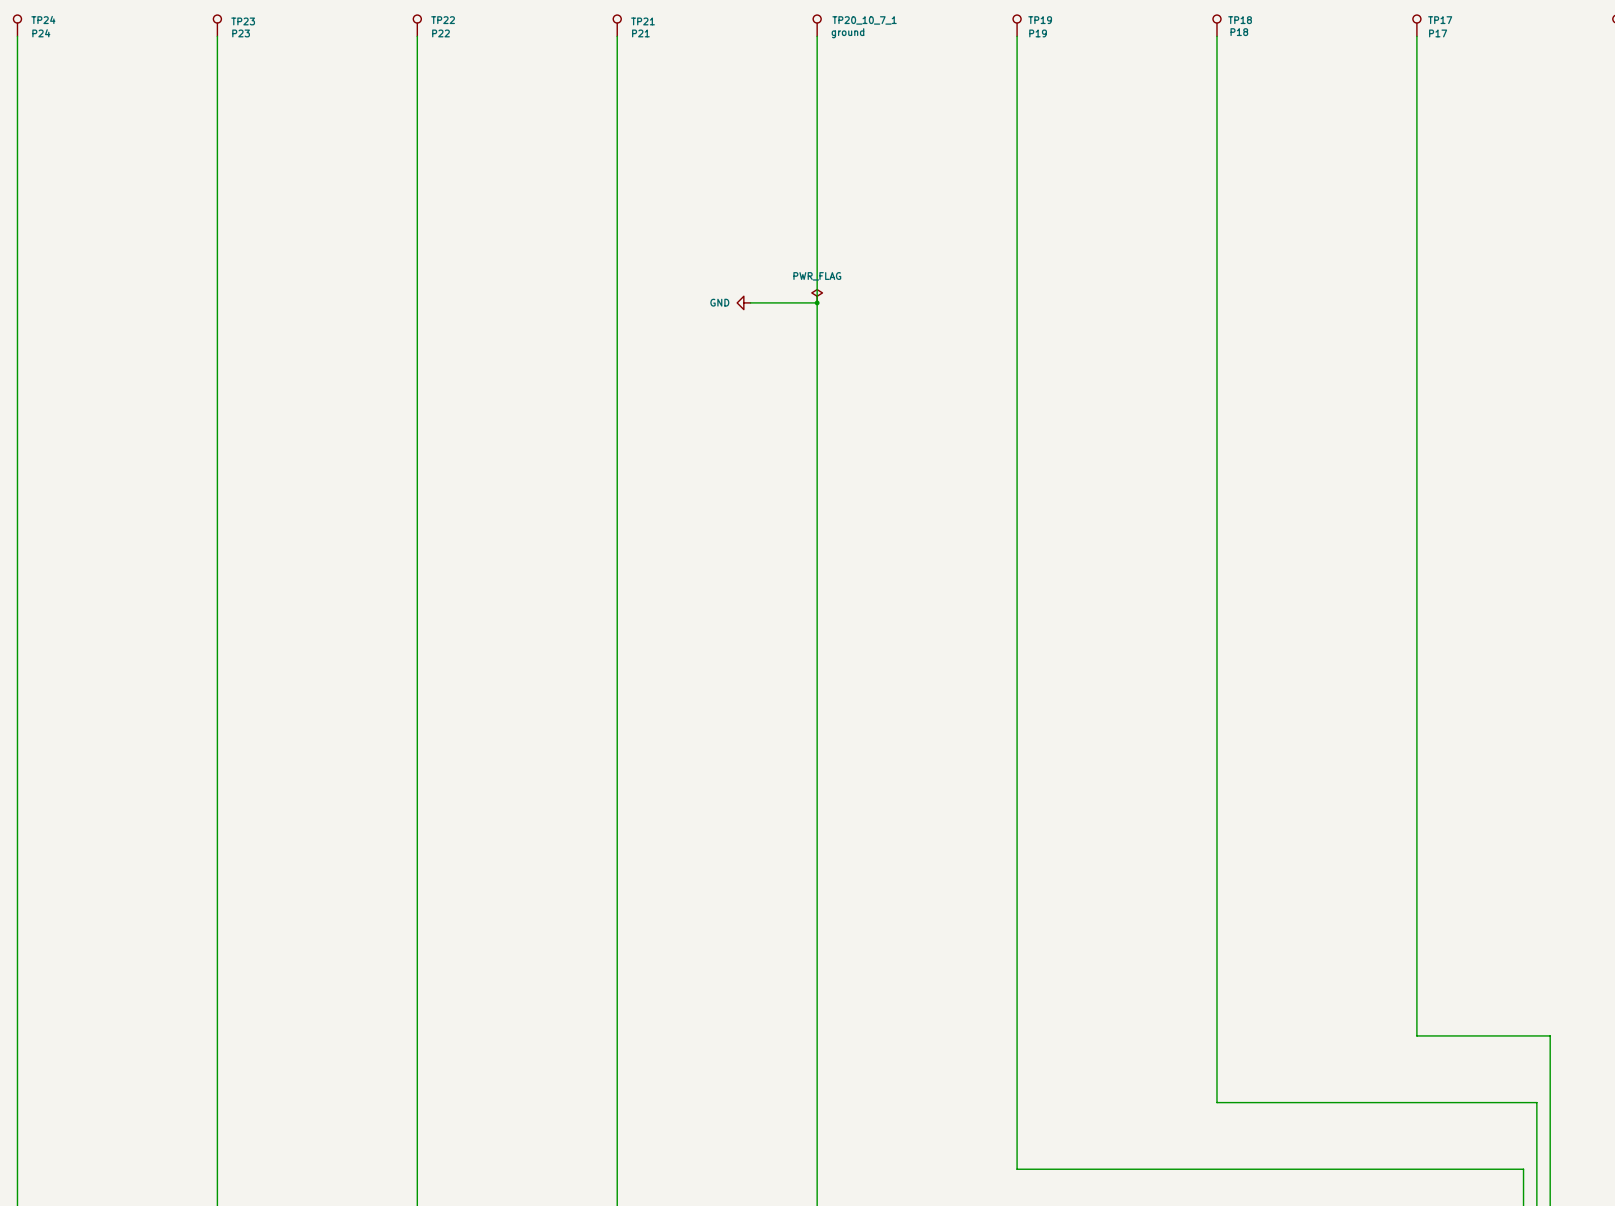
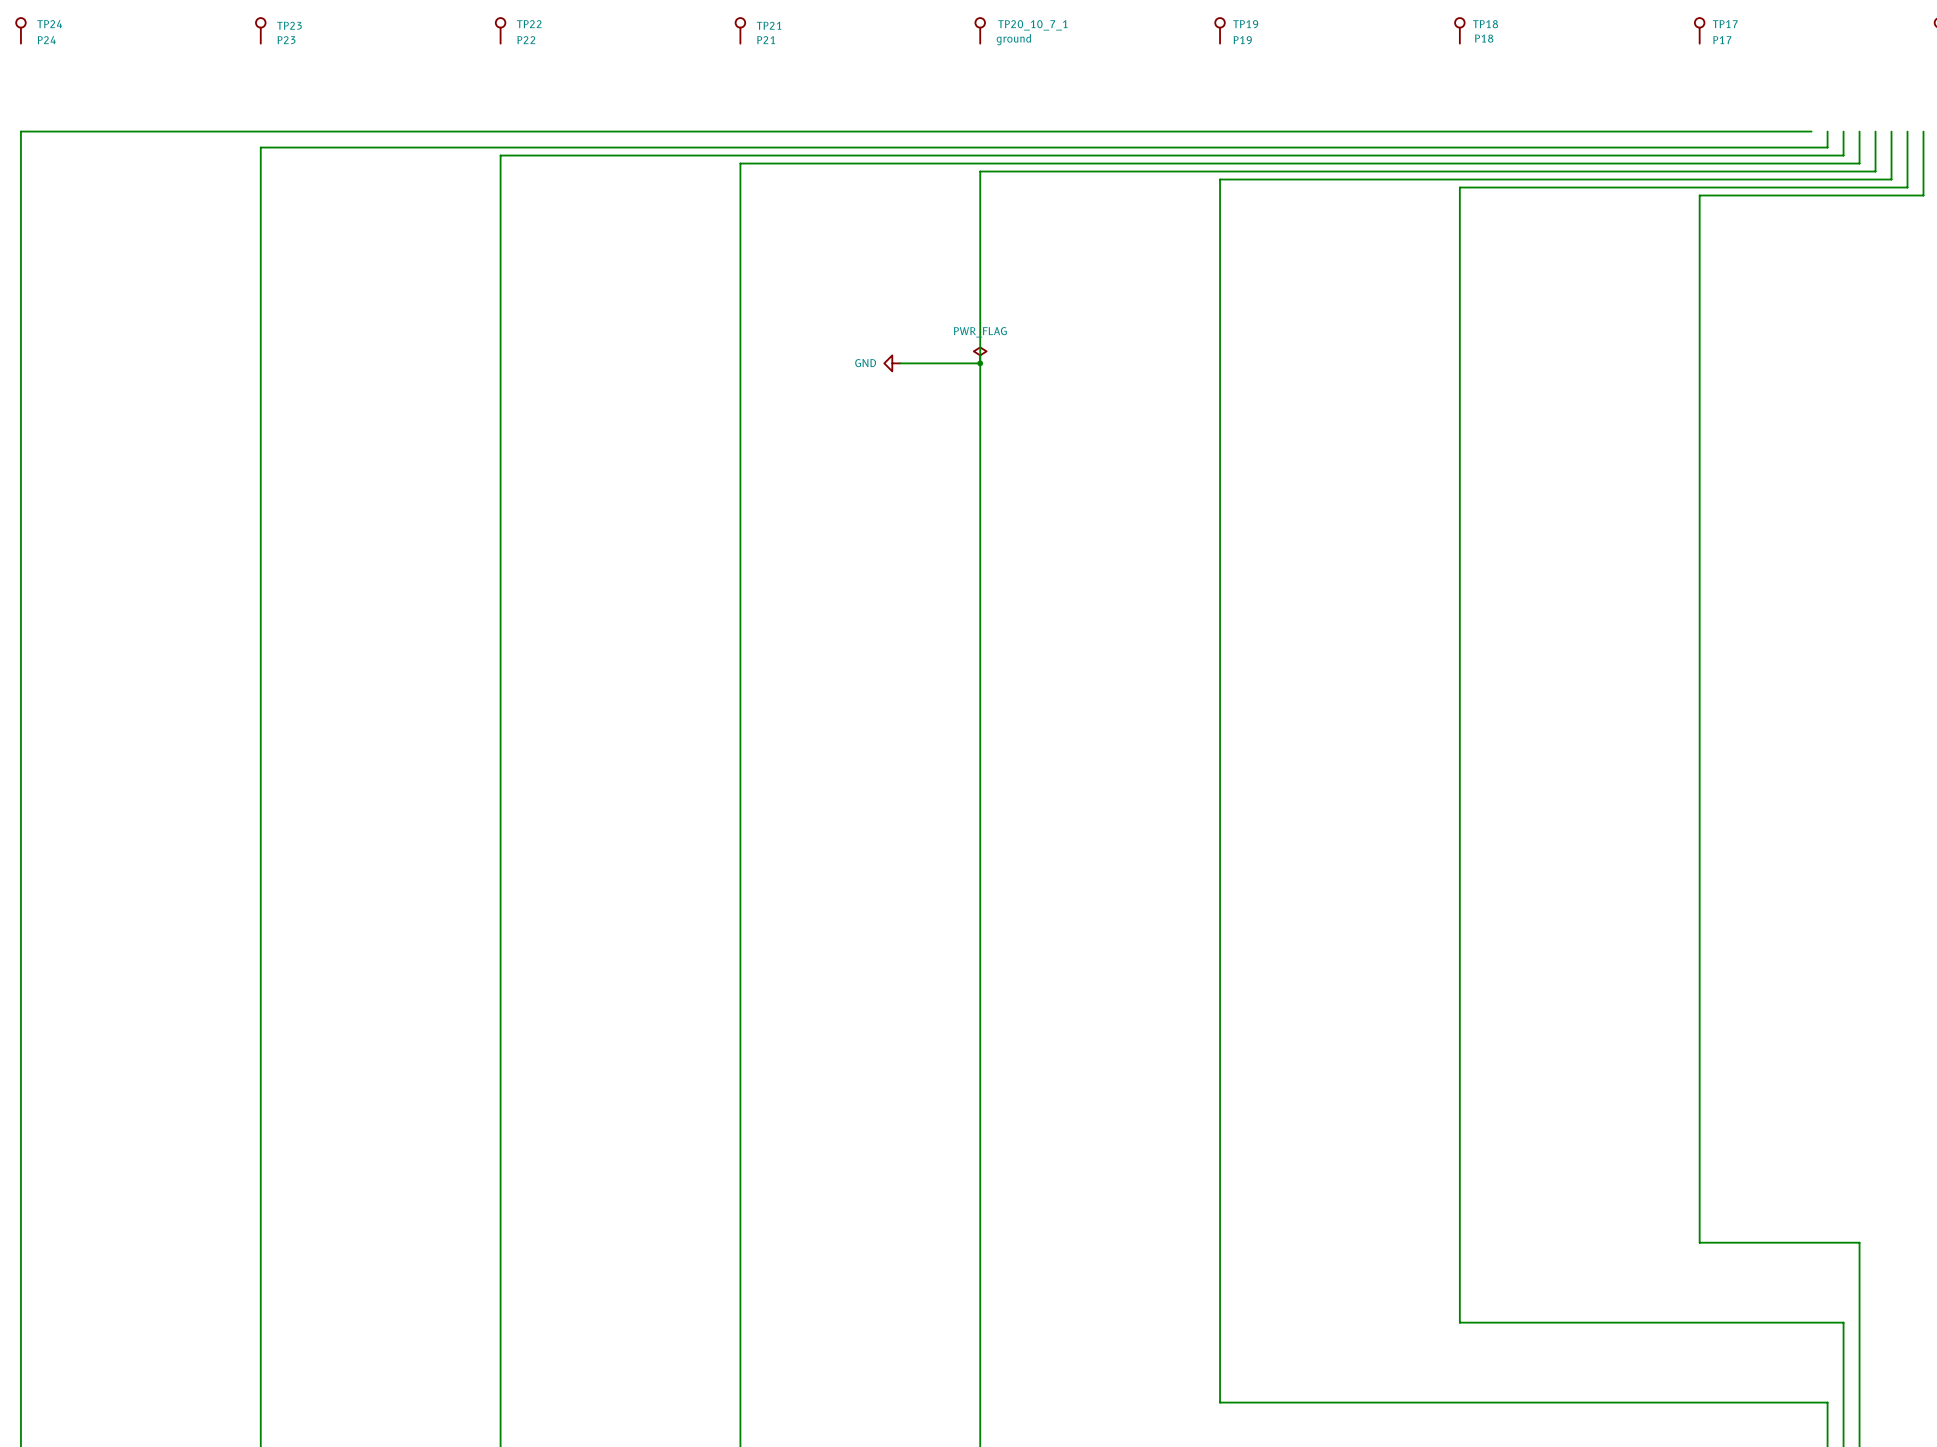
wire: (17, 36) (17, 109) -> (1811, 131) (20, 131)
wire: (217, 36) (217, 123) -> (1827, 131) (1827, 147) (260, 147)
wire: (417, 36) (417, 129) -> (1843, 131) (1843, 155) (500, 155)
wire: (617, 36) (617, 136) -> (1859, 131) (1859, 163) (740, 163)
wire: (817, 36) (817, 142) -> (1875, 131) (1875, 171) (980, 171)
wire: (1017, 36) (1017, 149) -> (1891, 131) (1891, 179) (1220, 179)
wire: (1216, 36) (1216, 156) -> (1907, 131) (1907, 187) (1459, 187)
wire: (1416, 36) (1416, 162) -> (1923, 131) (1923, 195) (1699, 195)

